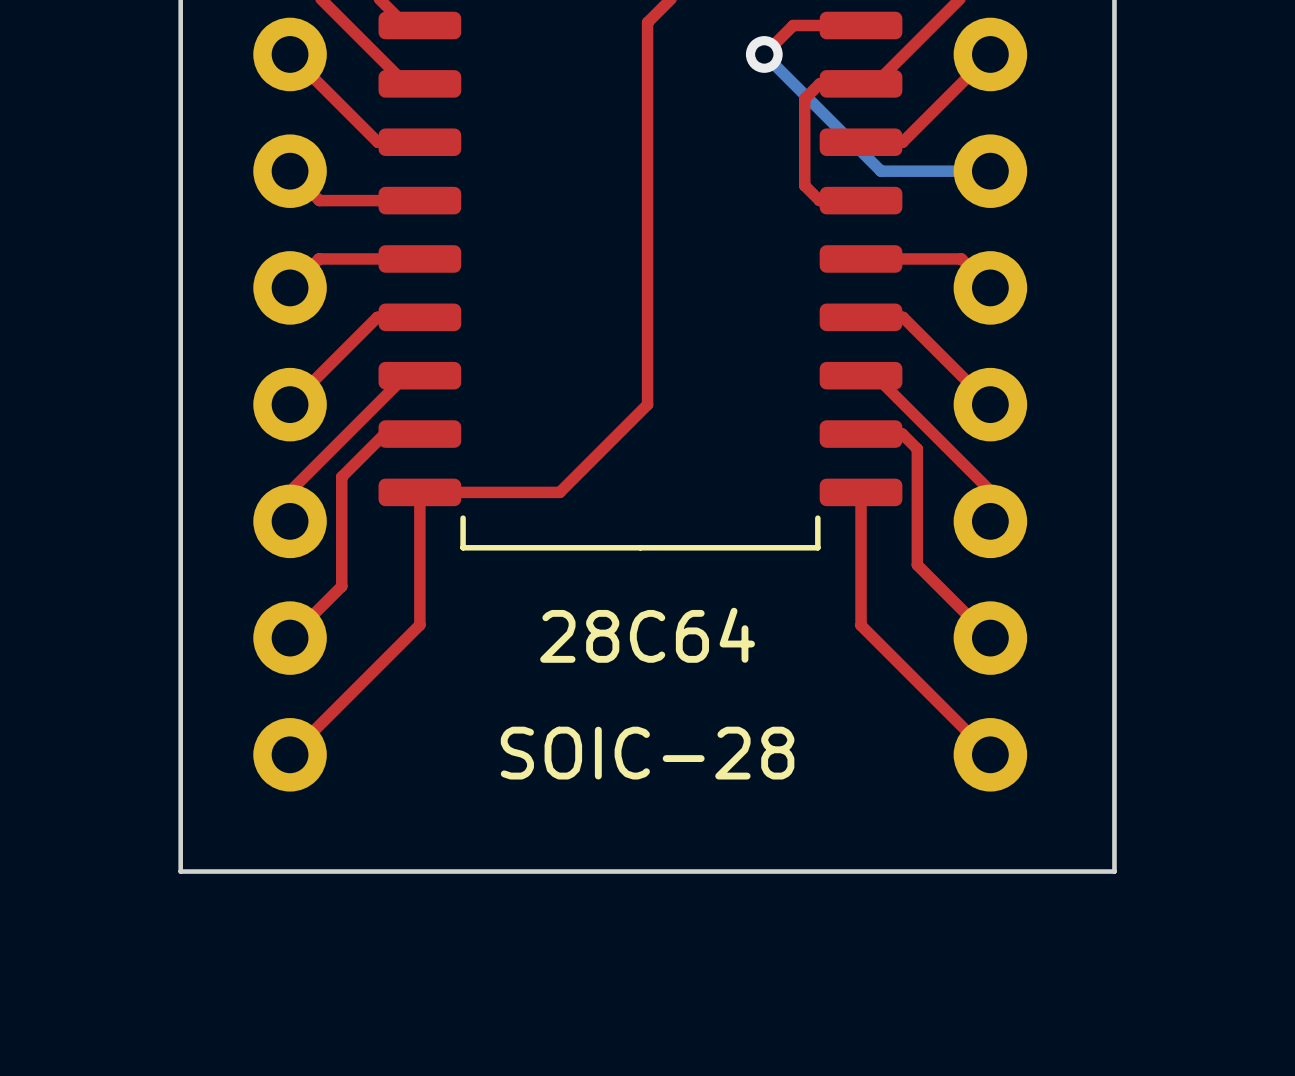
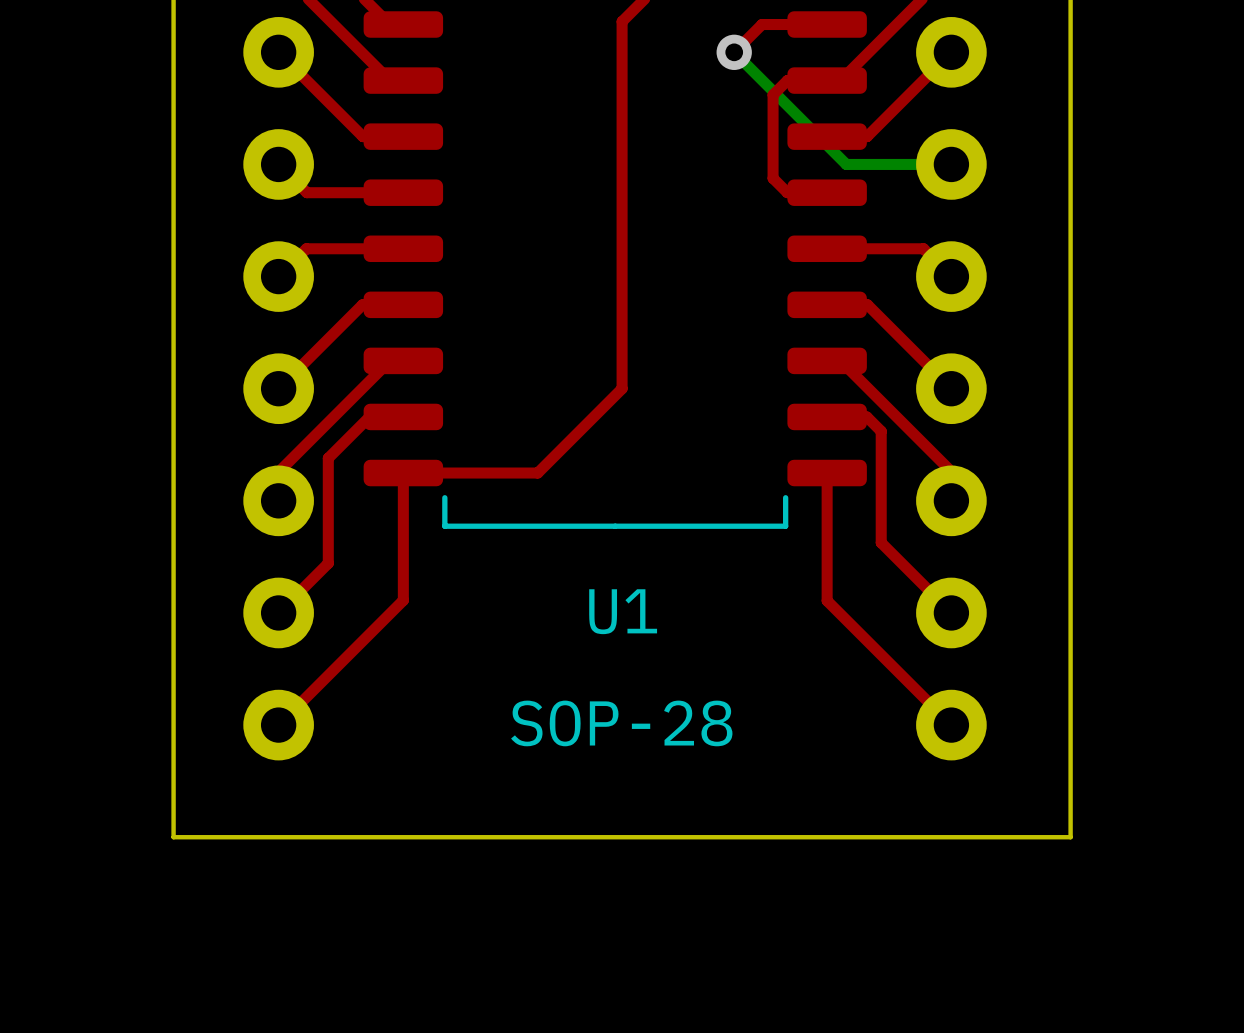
28C64 name: 28C64 (647, 635) -> U1 (623, 611)
text: SOIC-28 (647, 753) -> SOP-28 (621, 723)

